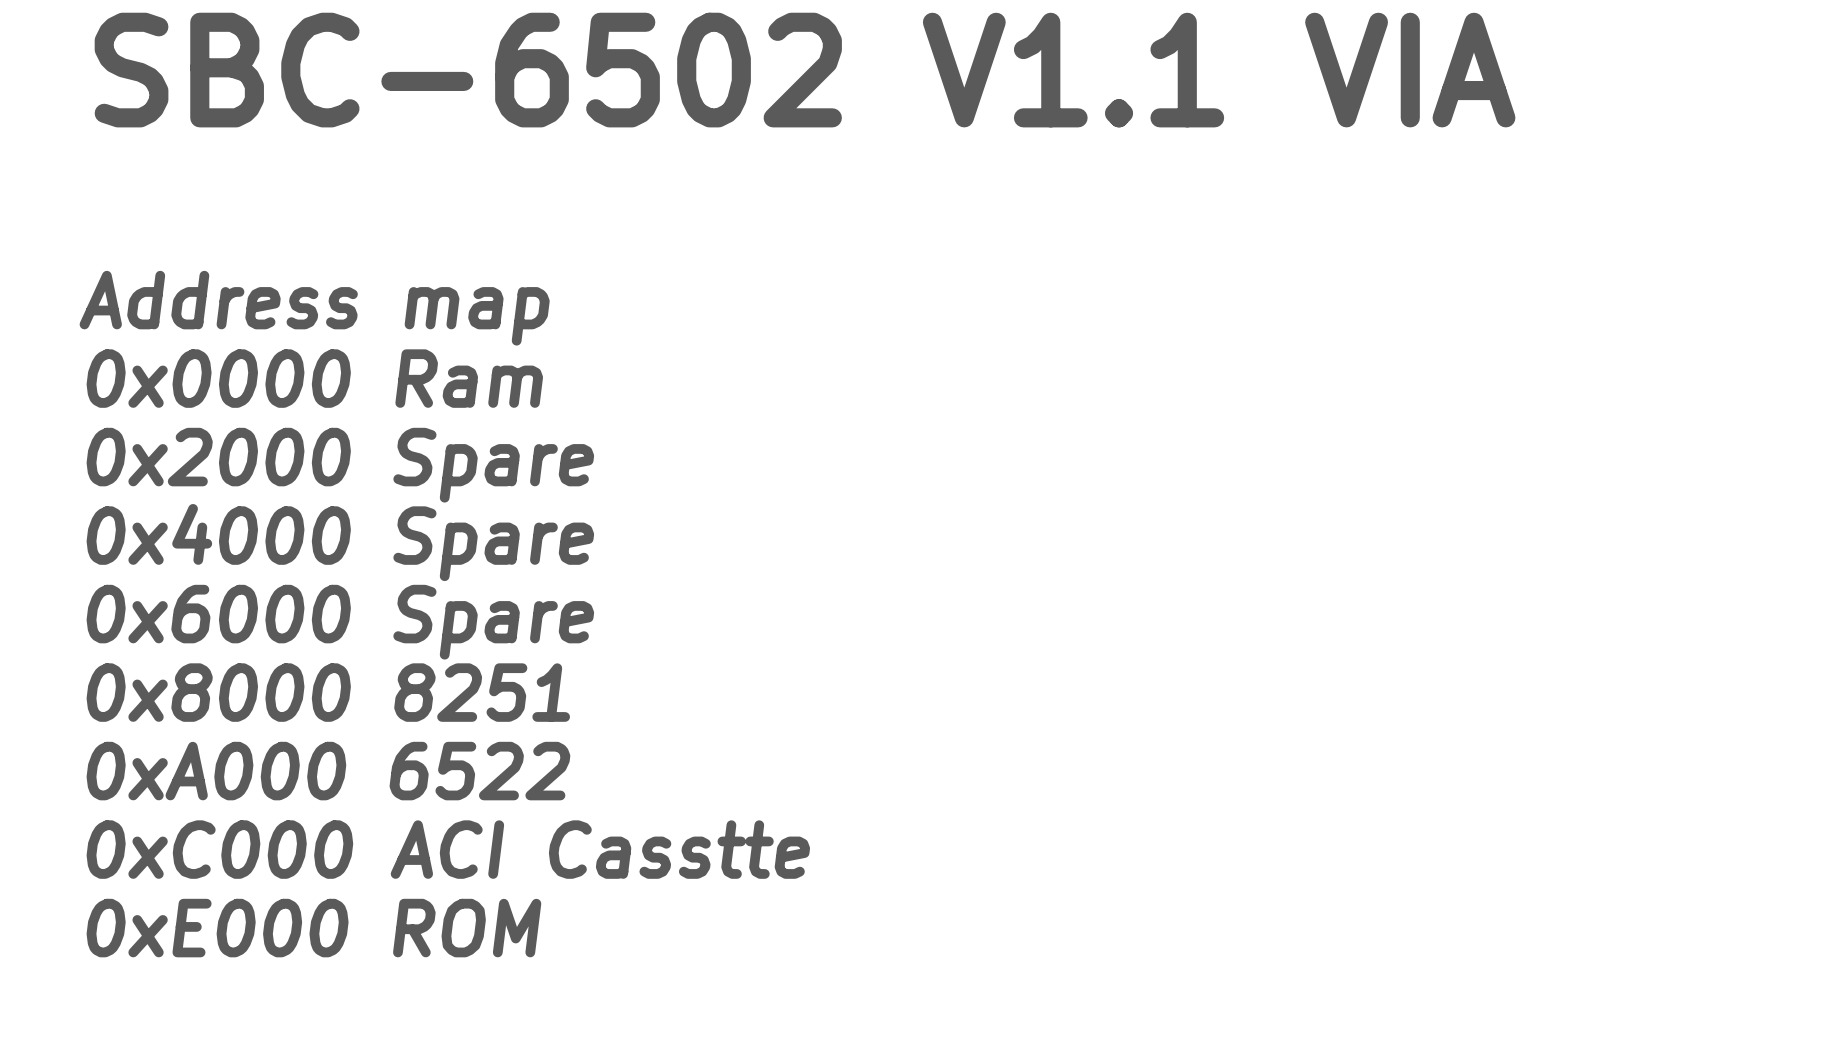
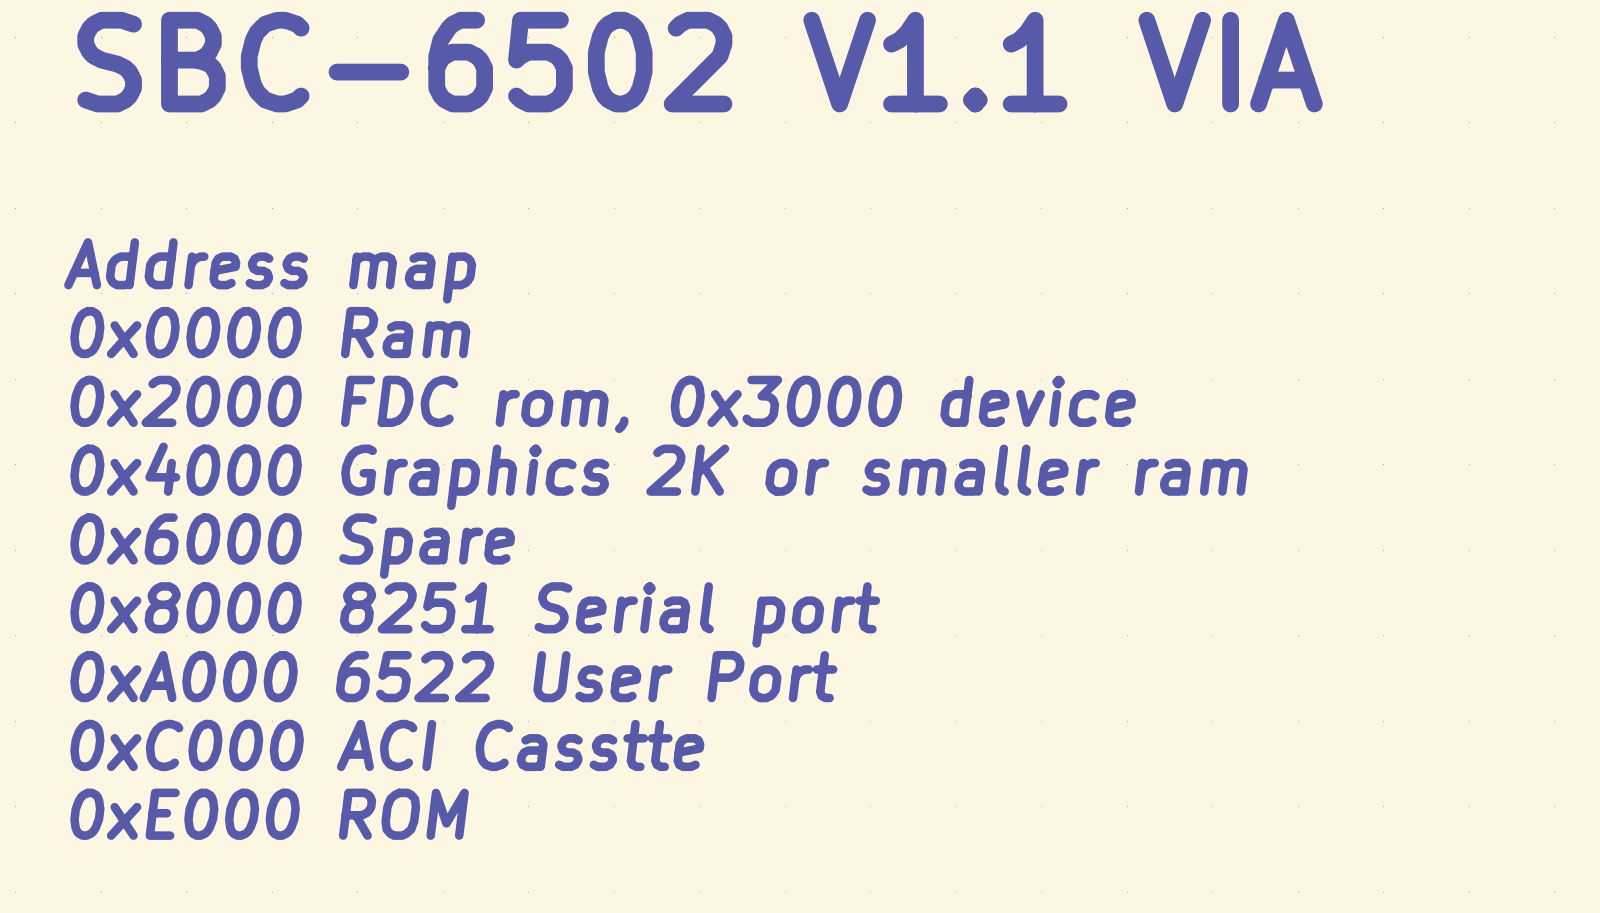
text: 0x2000 Spare (340, 465) -> 0x2000 FDC rom, 0x3000 device (603, 404)
text: 0x4000 Spare (340, 542) -> 0x4000 Graphics 2K or smaller ram (659, 476)
text: 0x8000 8251 (328, 692) -> 0x8000 8251 Serial port (475, 614)
text: 0xA000 6522 (328, 771) -> 0xA000 6522 User Port (453, 676)

